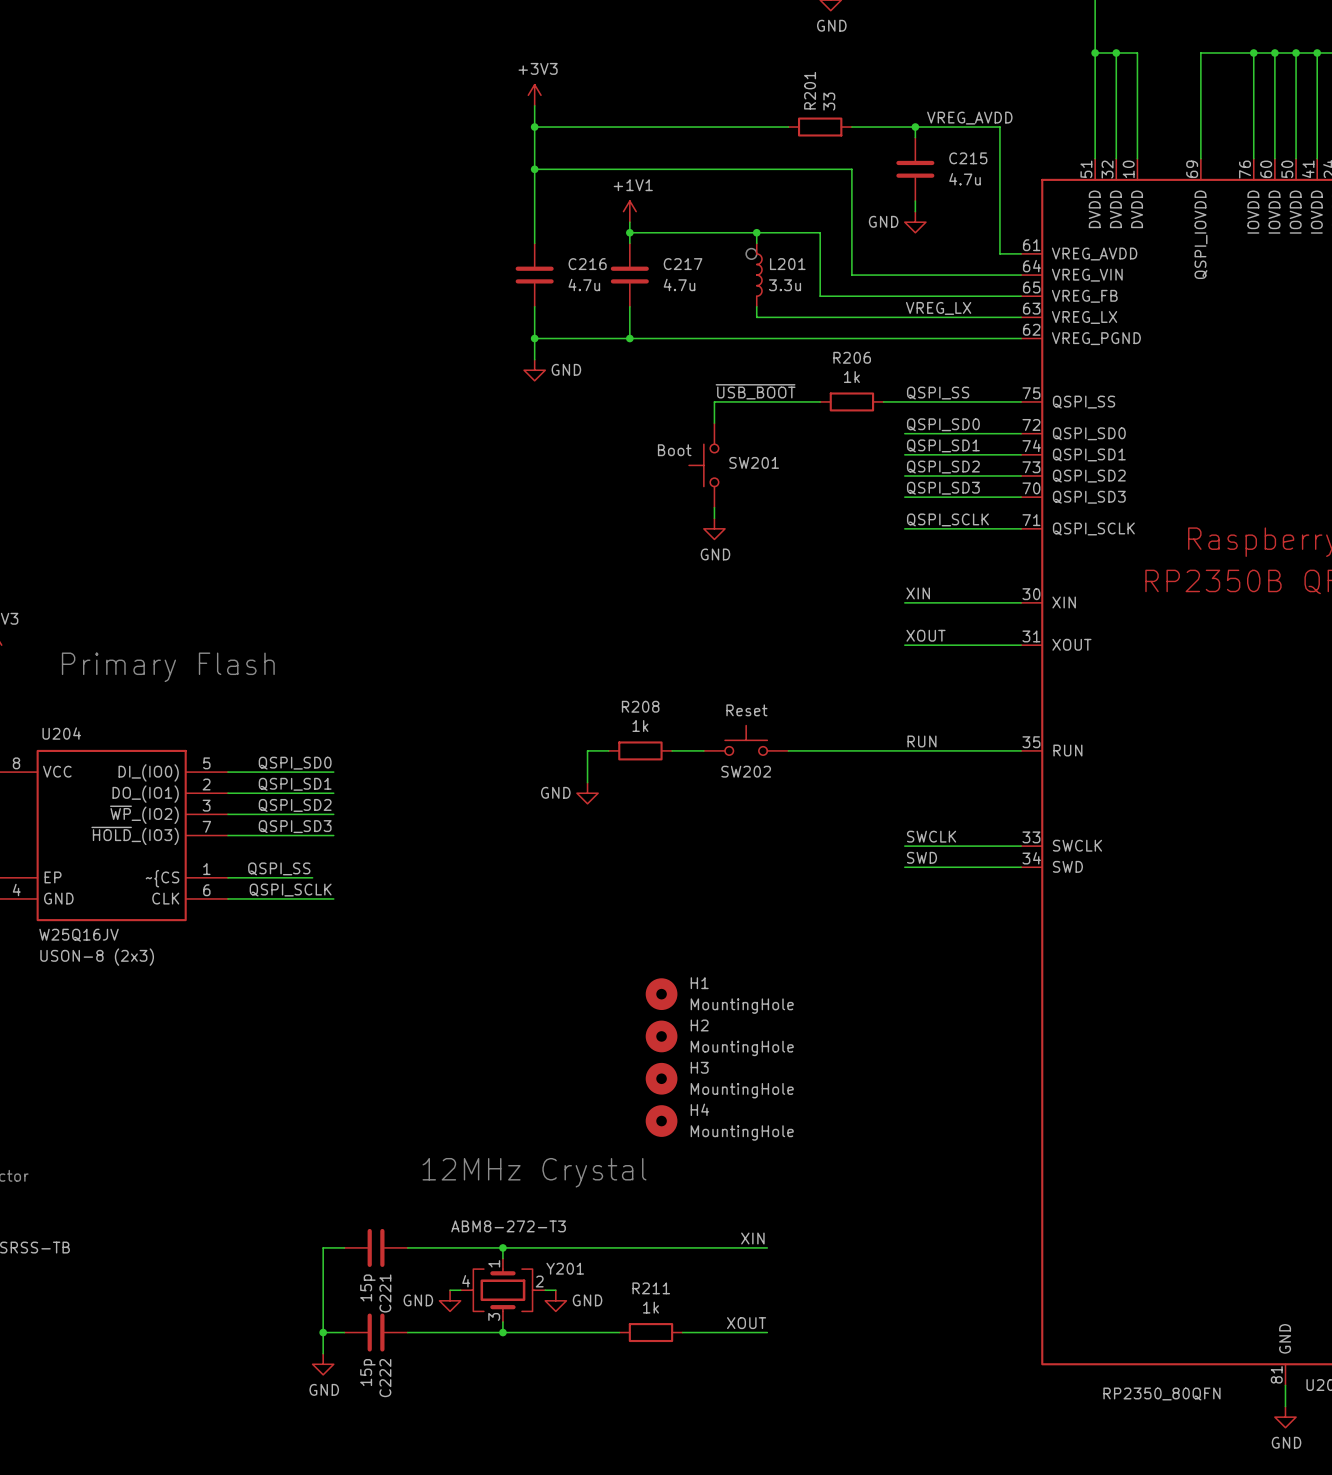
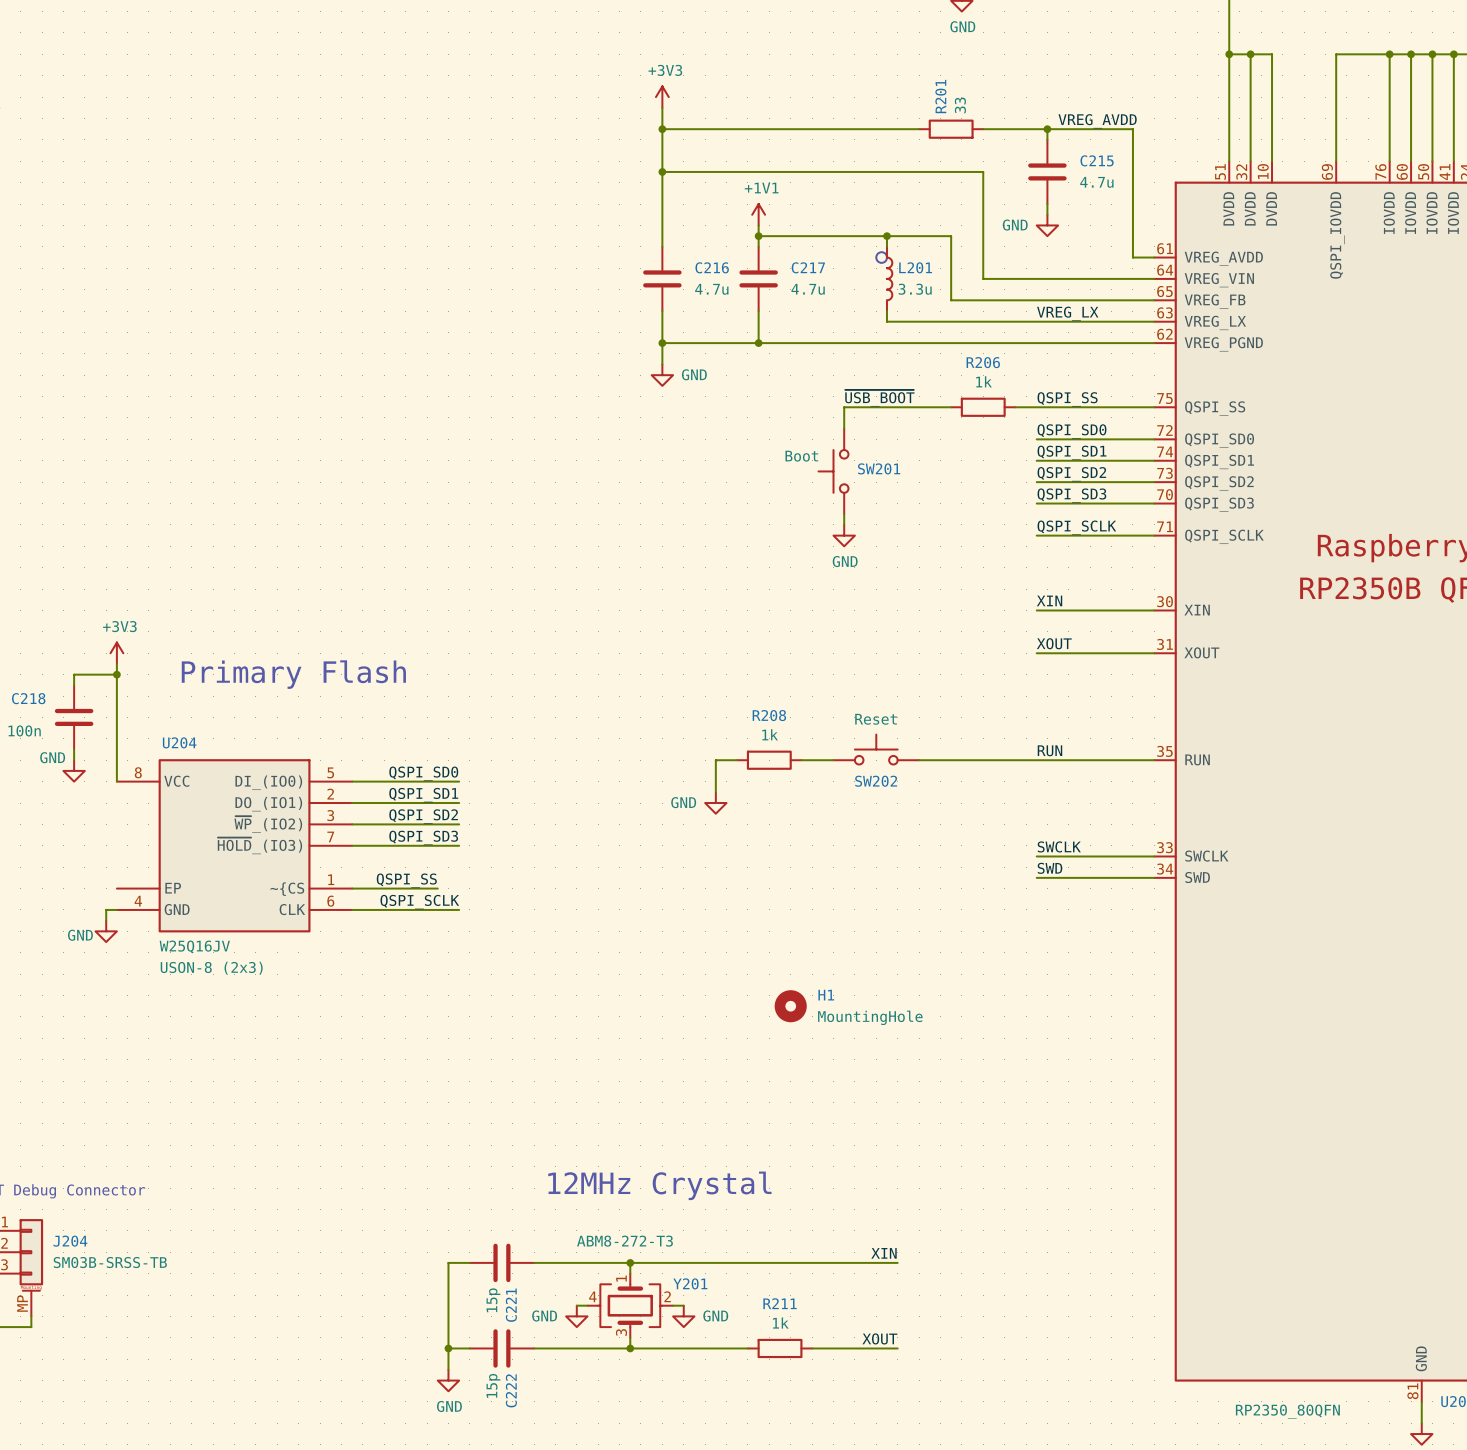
H2: MountingHole (661, 1036) -> none
H3: MountingHole (661, 1078) -> none
H4: MountingHole (661, 1121) -> none

